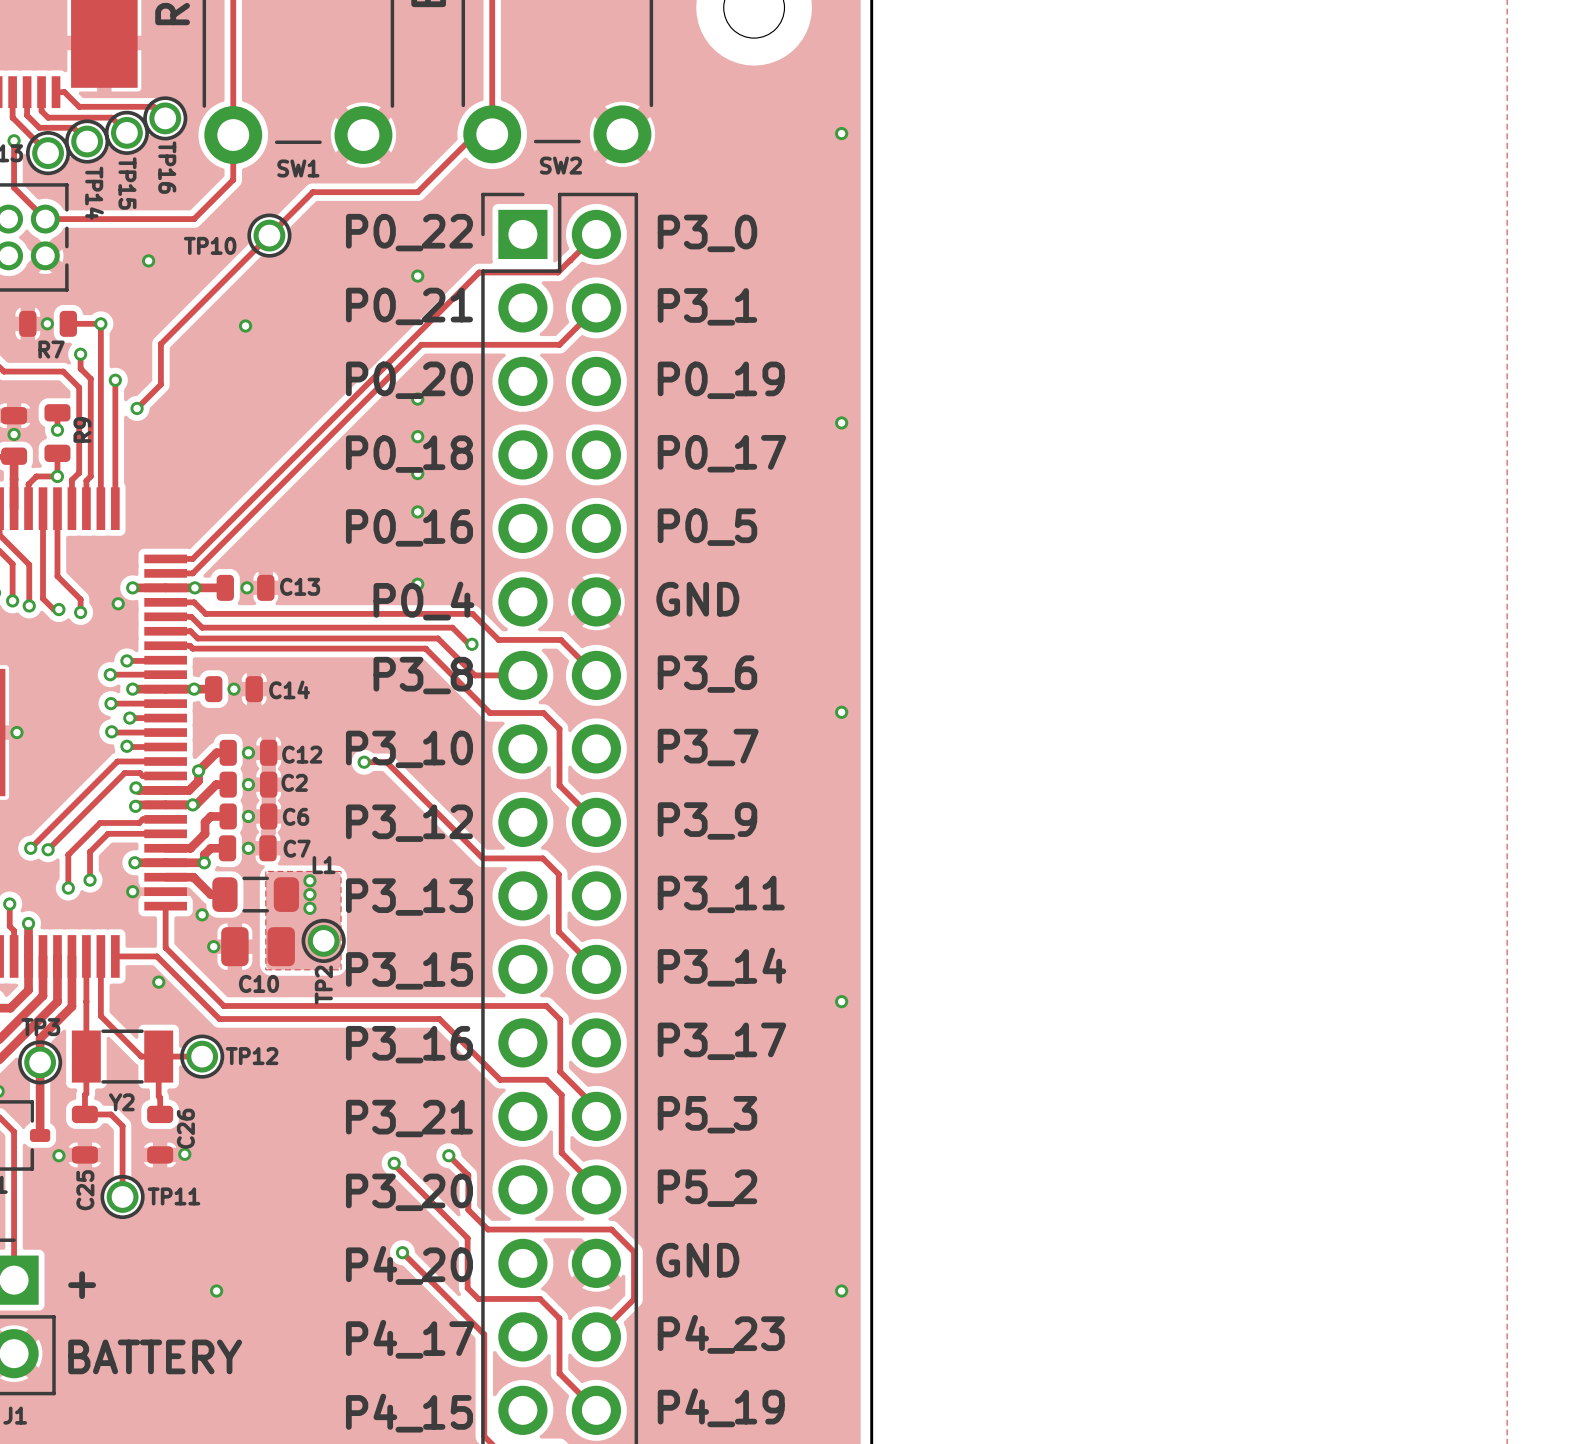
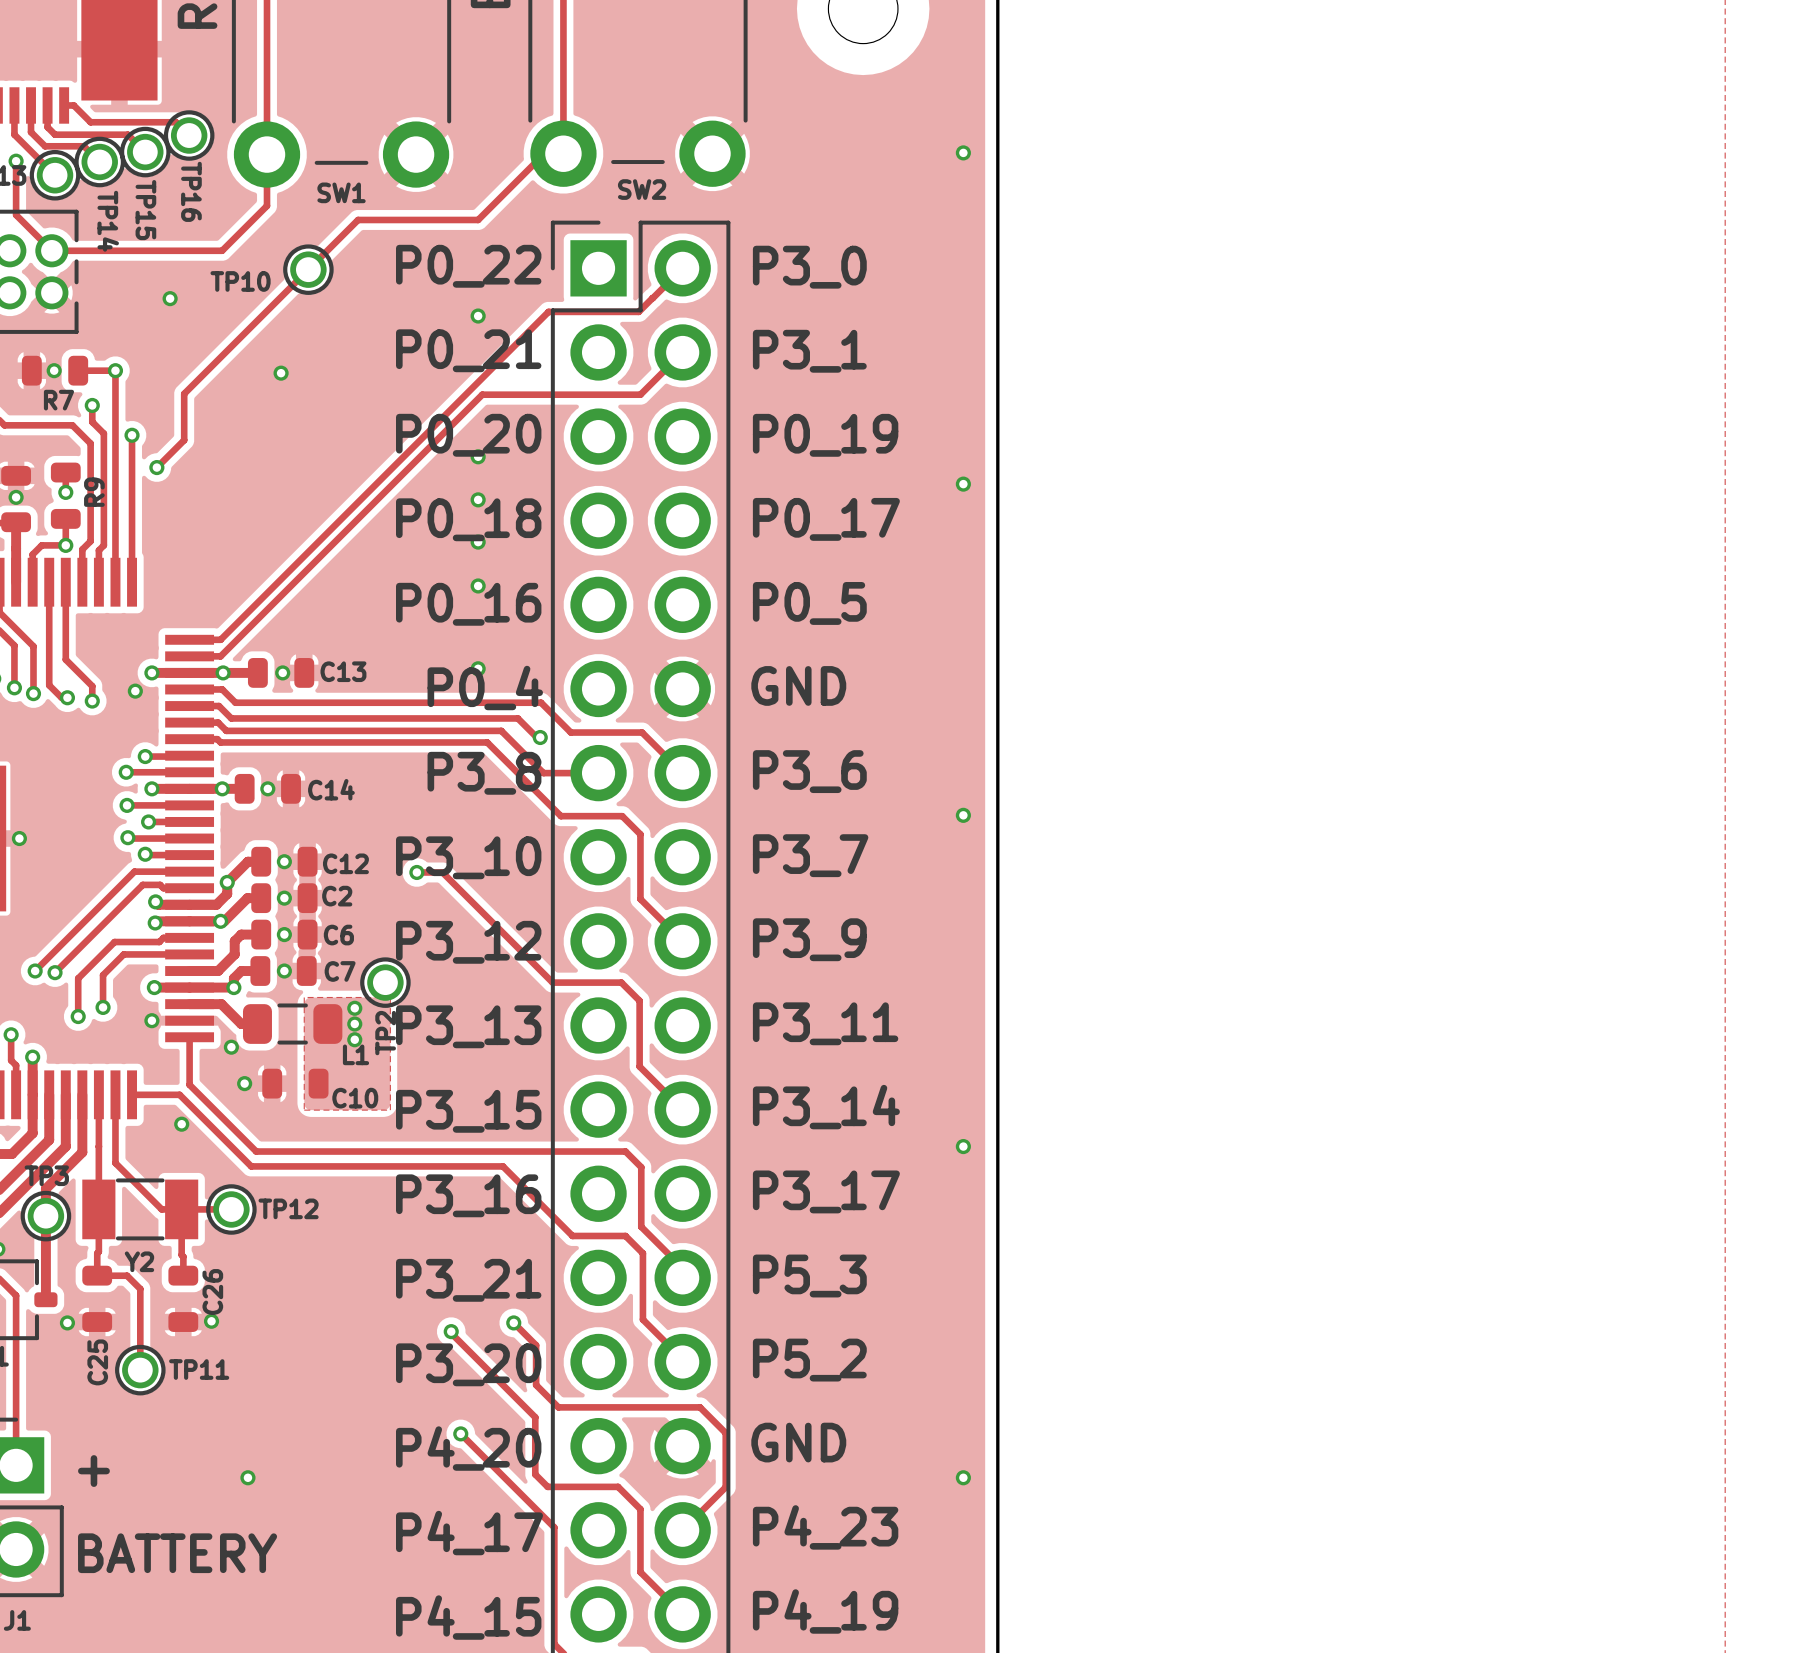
L1 name position: L1 (324, 865) -> L1 (355, 1054)
C10 footprint: [221, 927, 295, 967] -> [262, 1068, 329, 1099]
TP2 position: (323, 940) -> (385, 982)
C10 name position: C10 (259, 983) -> C10 (355, 1098)

